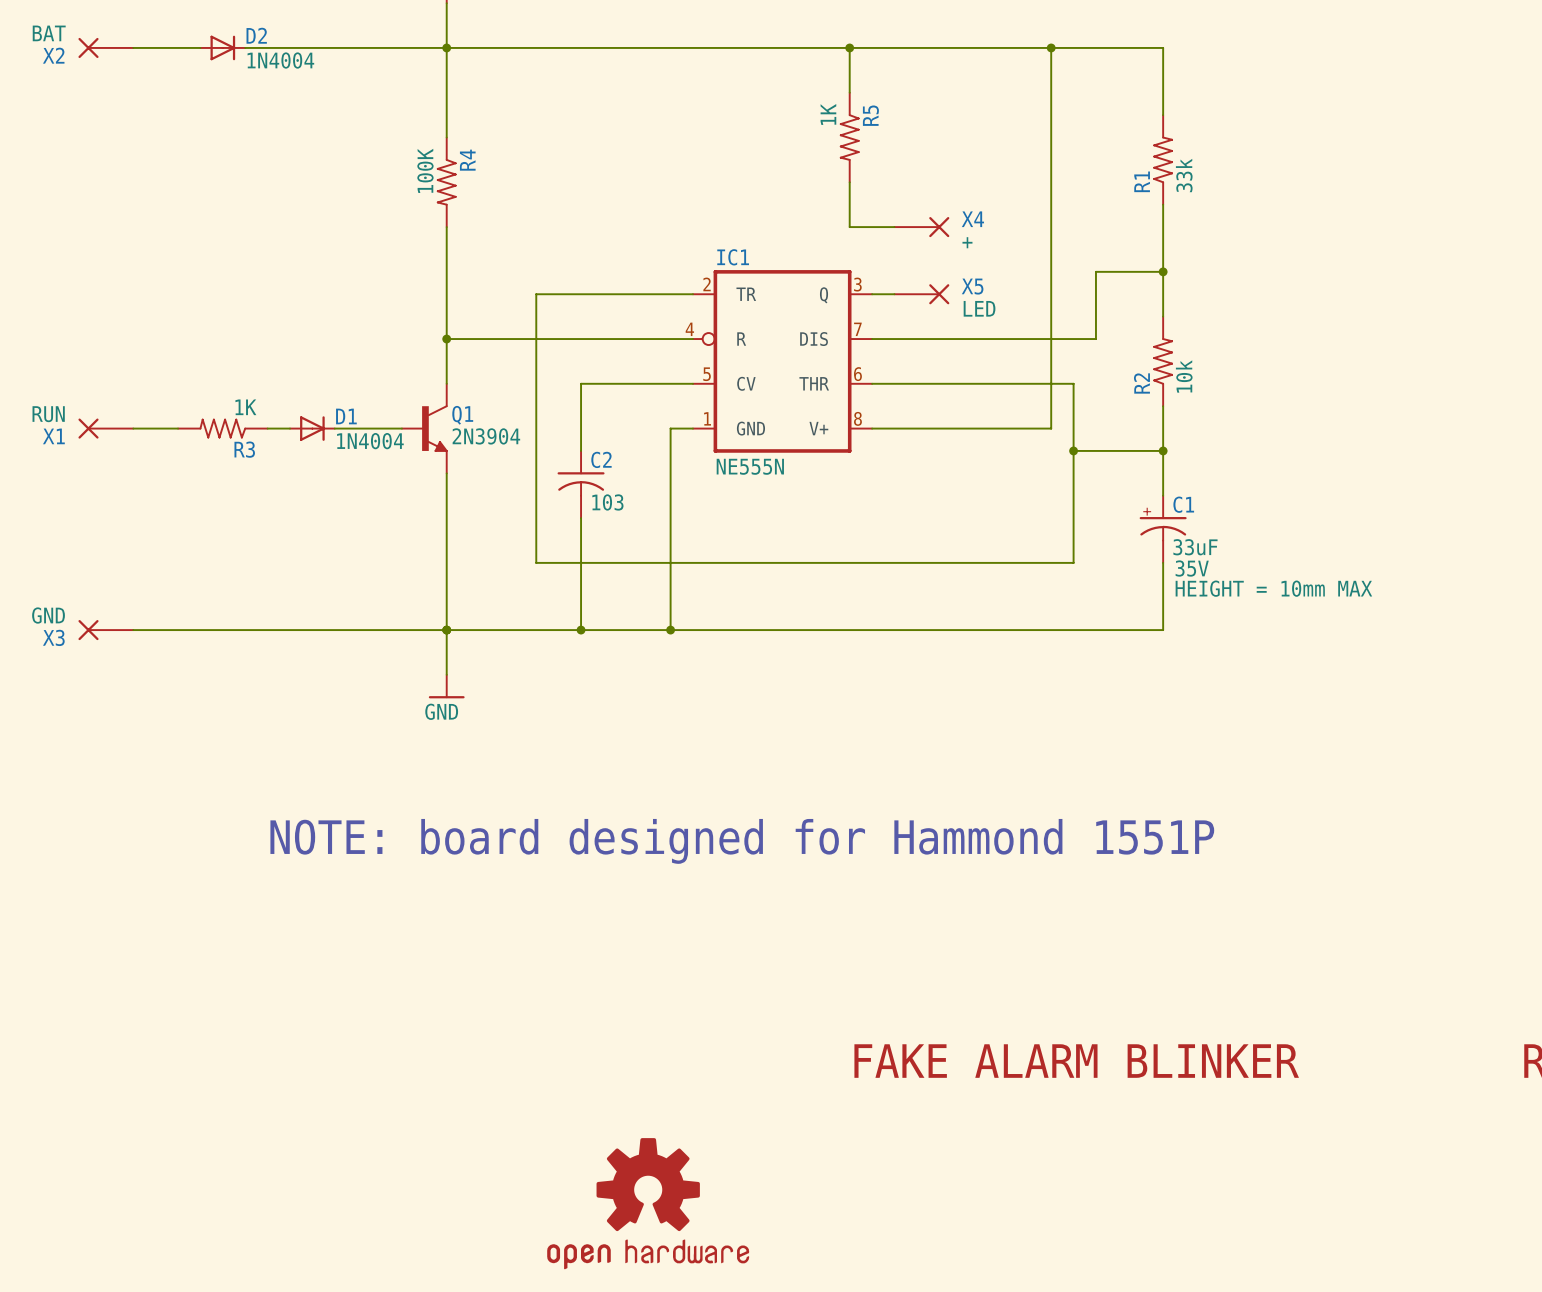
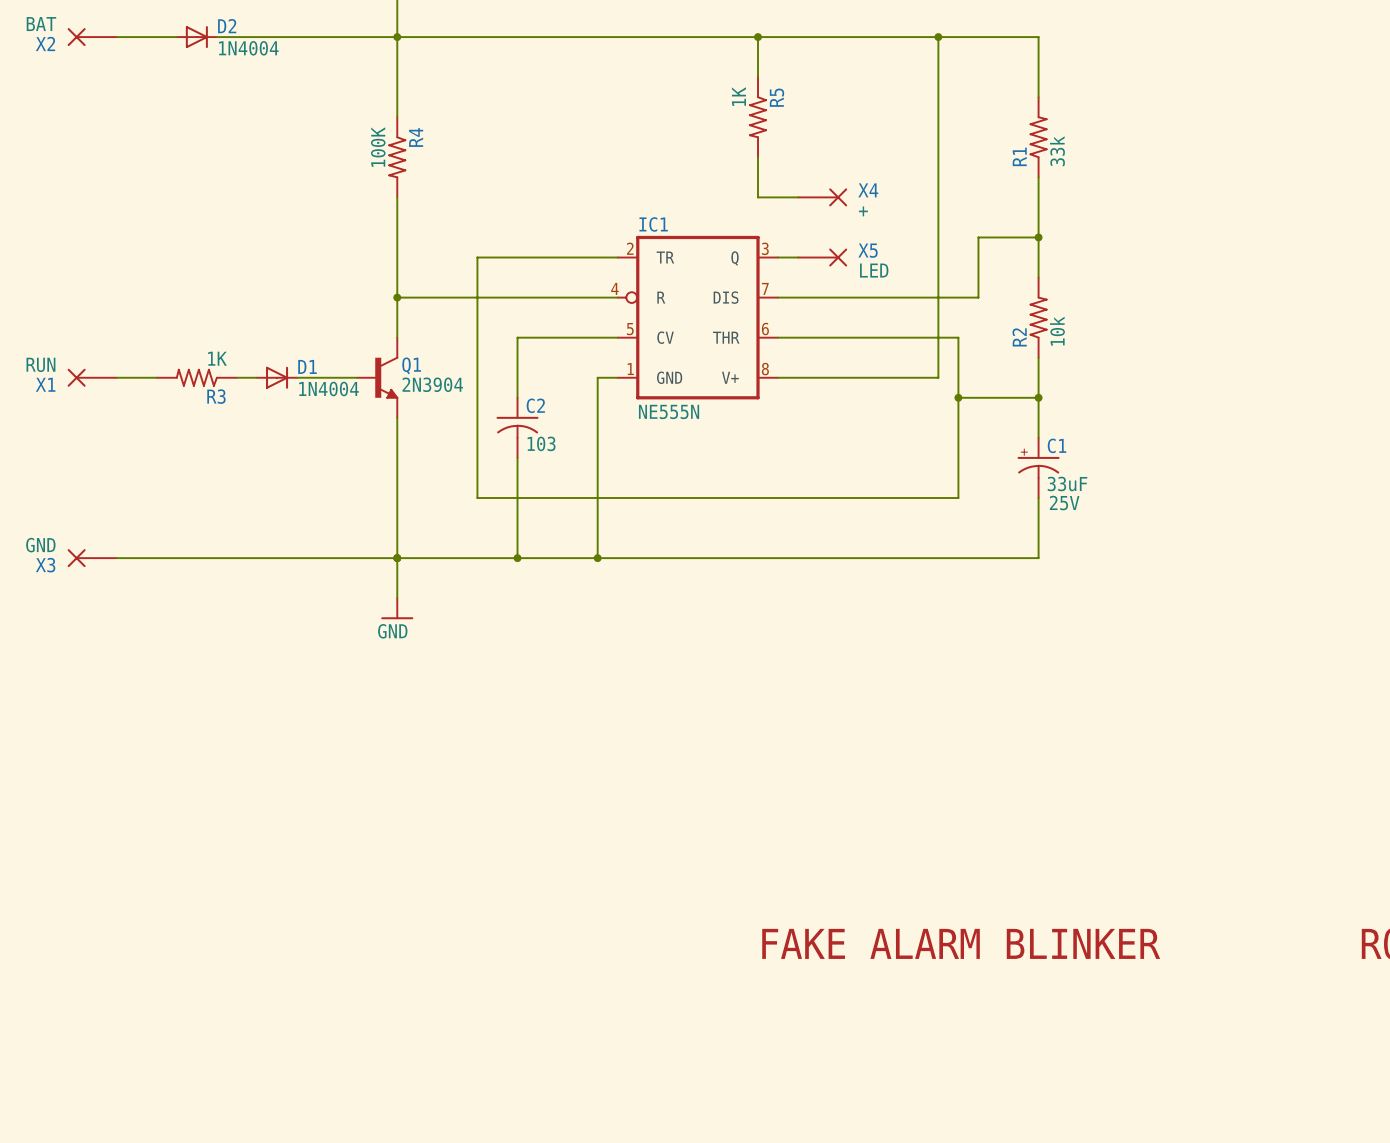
C1 text: 35V (1192, 568) -> 25V (1064, 503)
C1 text: HEIGHT = 10mm MAX (1273, 588) -> none
text: NOTE: board designed for Hammond 1551P (742, 841) -> none
part: (648, 1203) -> none

